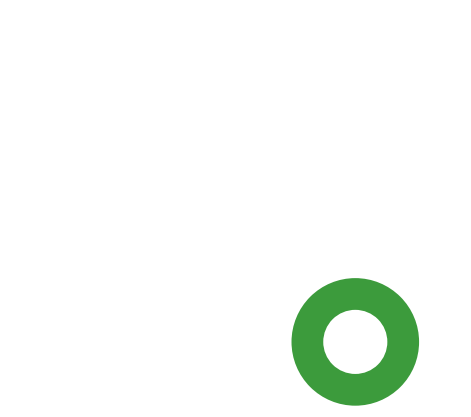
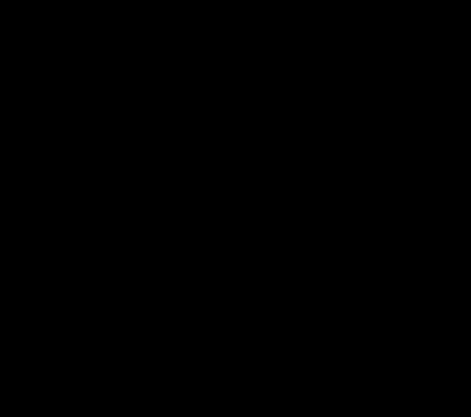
part: (355, 341) -> none

